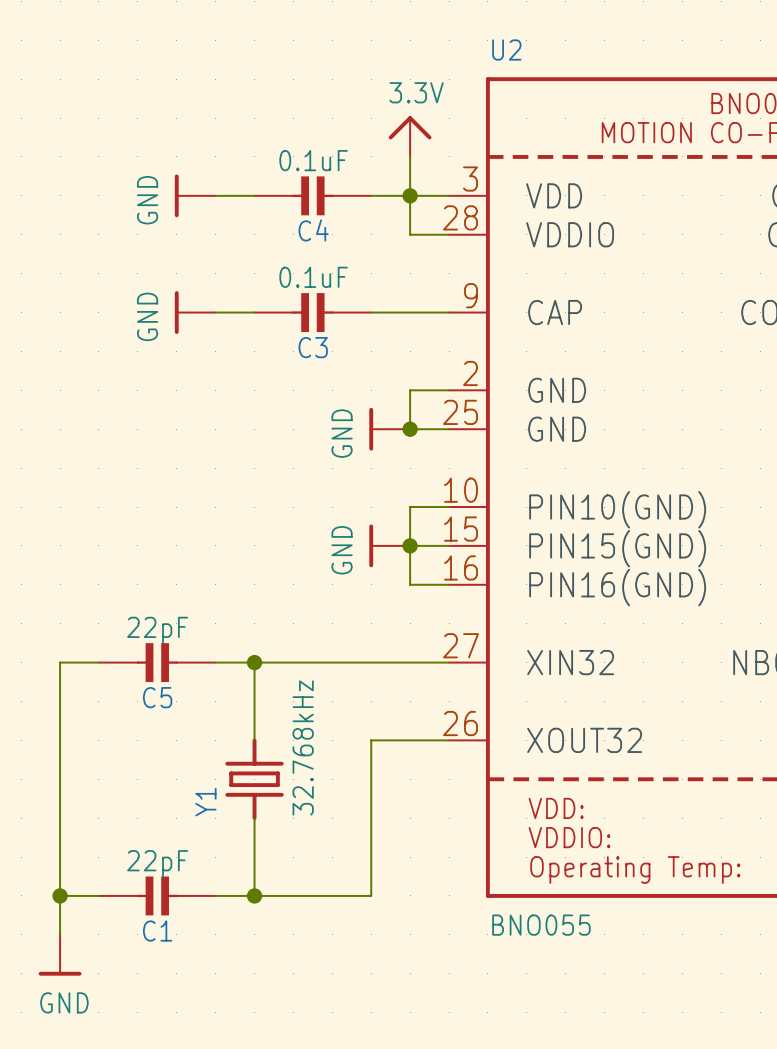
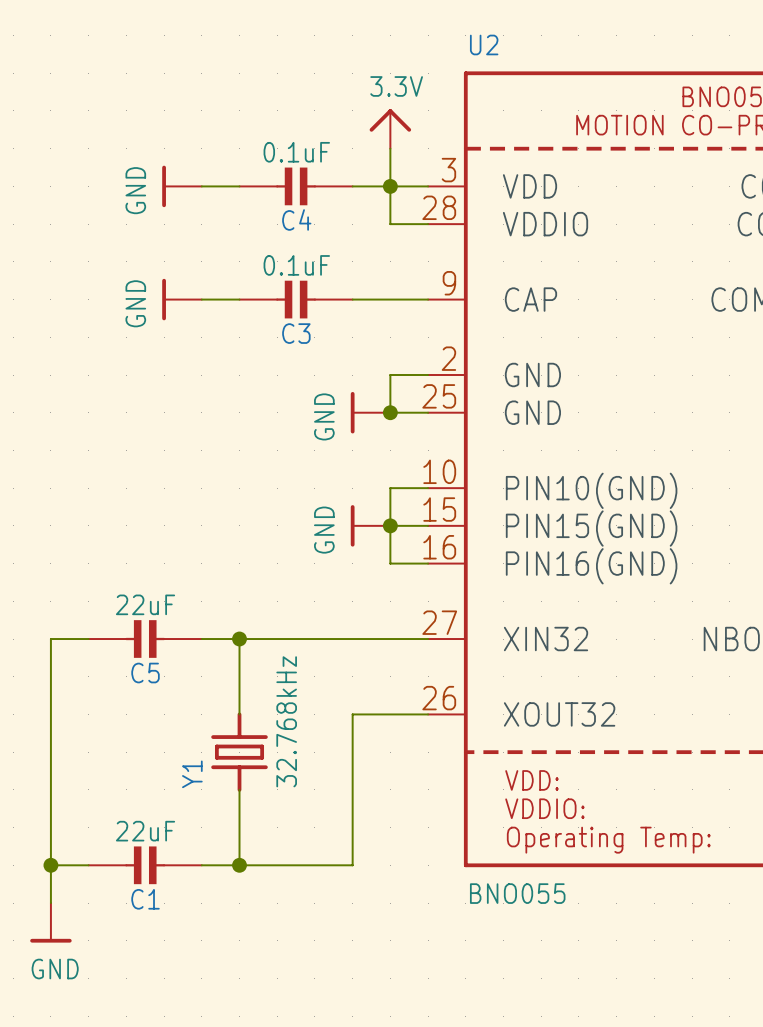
C5 value: 22pF (157, 630) -> 22uF (145, 604)
C1 value: 22pF (157, 863) -> 22uF (145, 831)

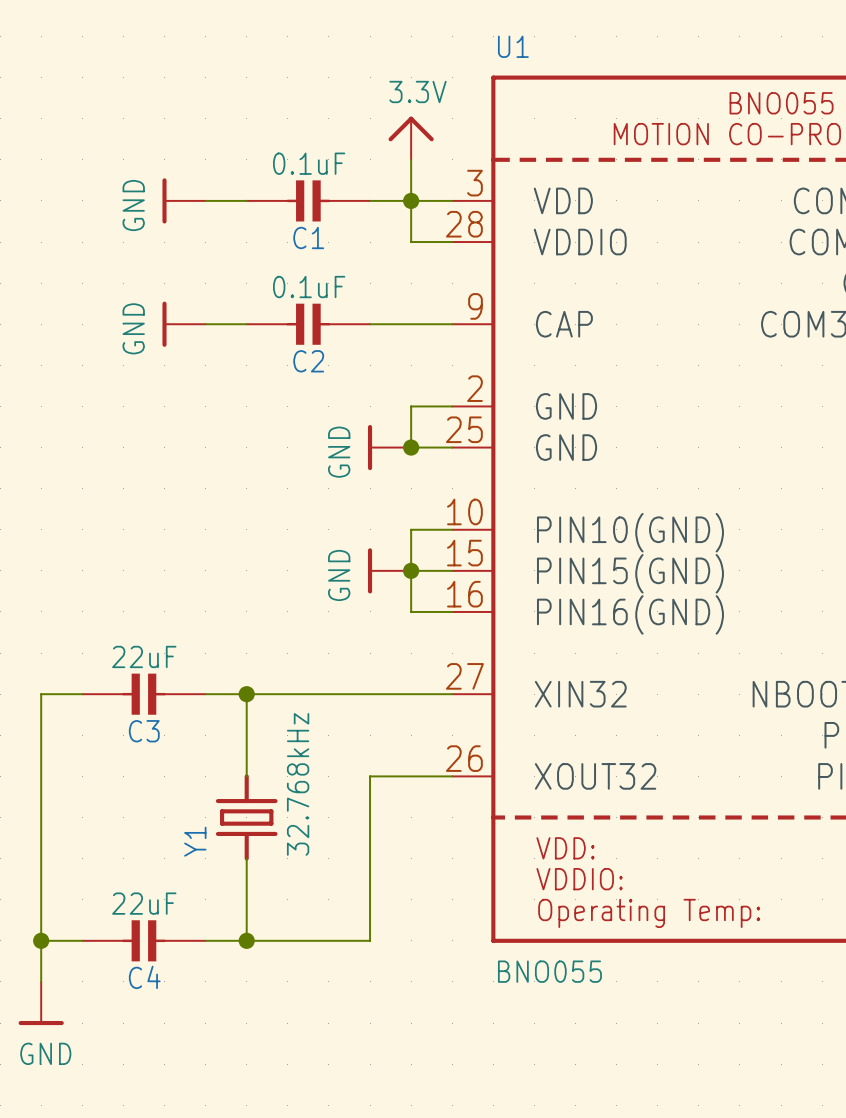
U2 name: U2 (484, 44) -> U1 (513, 46)
C4 name: C4 (296, 219) -> C1 (308, 237)
C3 name: C3 (296, 333) -> C2 (308, 361)
C5 name: C5 (145, 673) -> C3 (144, 731)
C1 name: C1 (145, 899) -> C4 (144, 977)

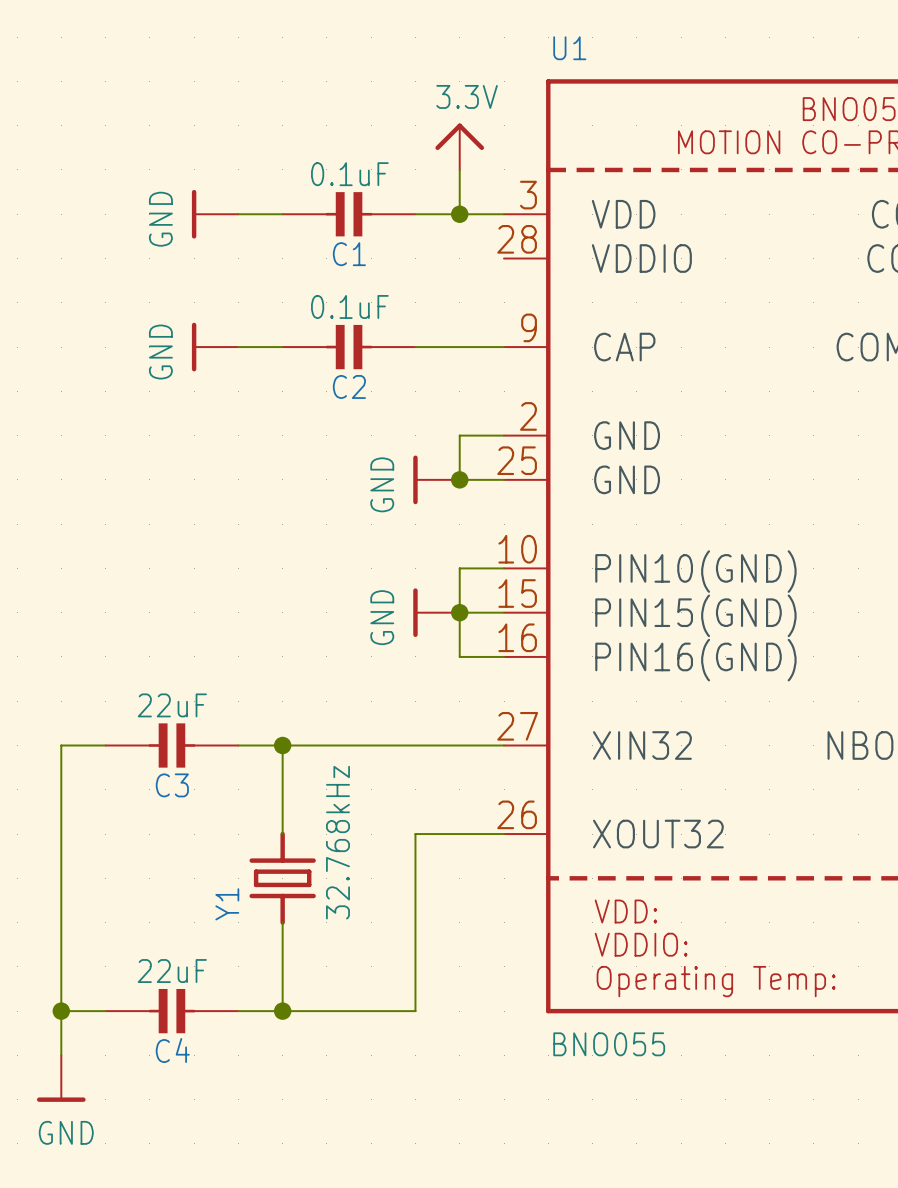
wire: (411, 200) (411, 242) (452, 242) -> none

